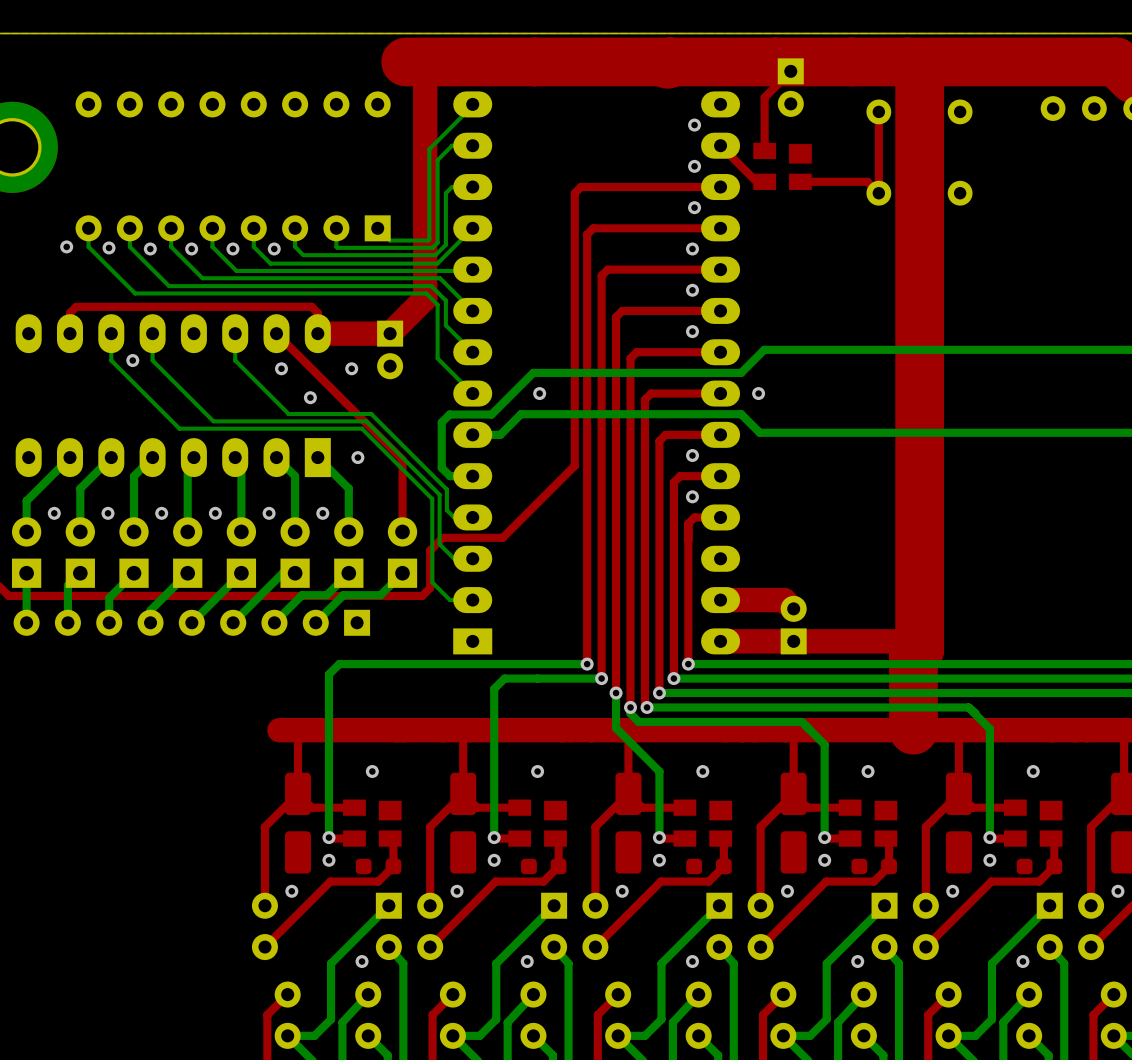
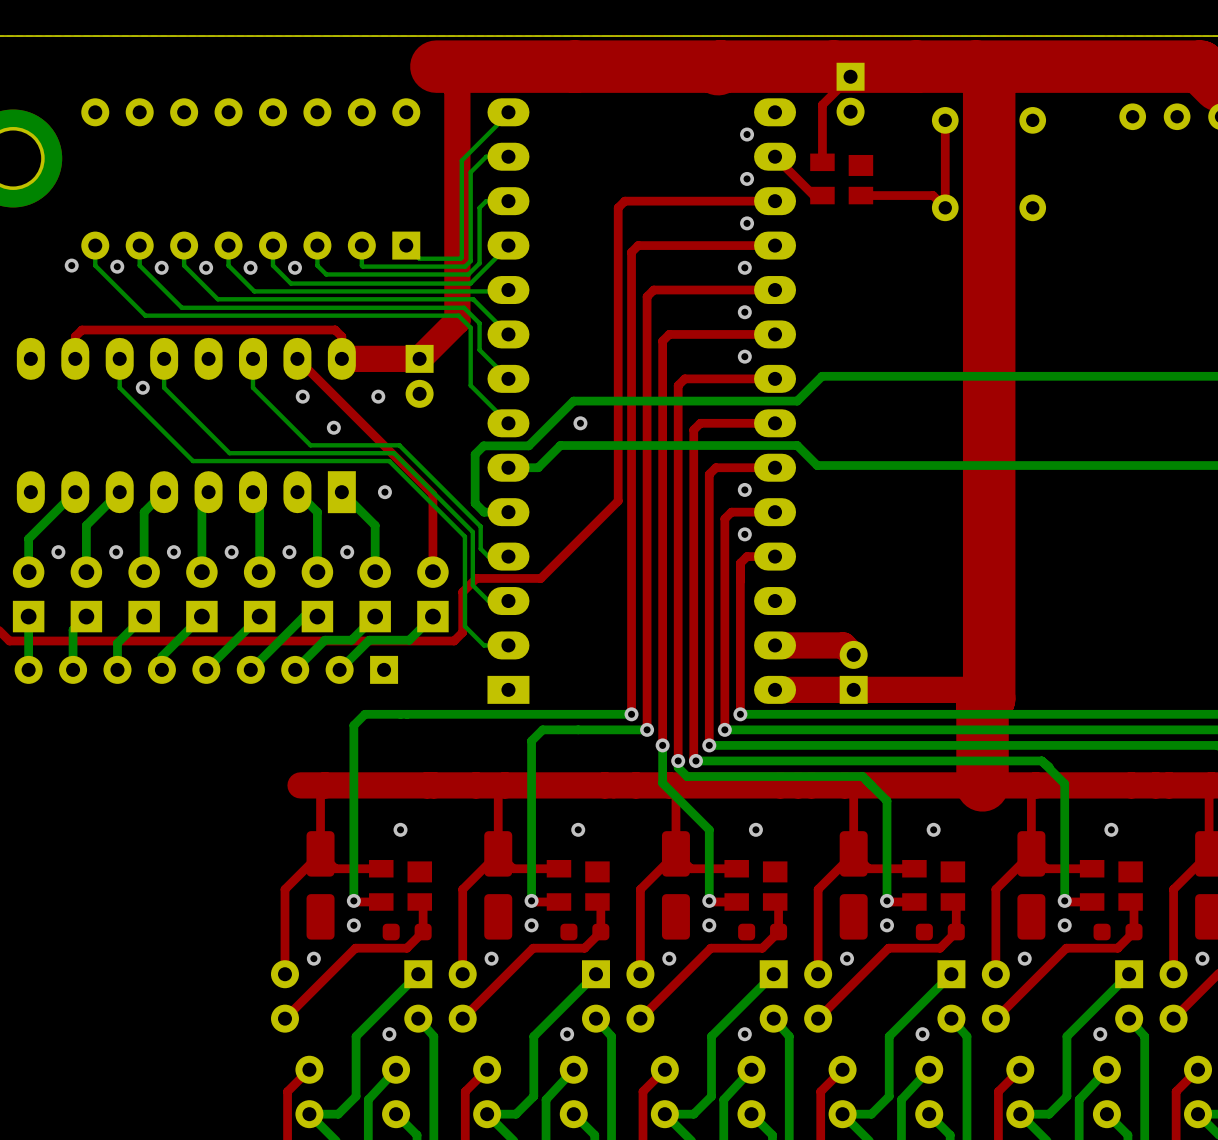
via: (758, 393) -> none

